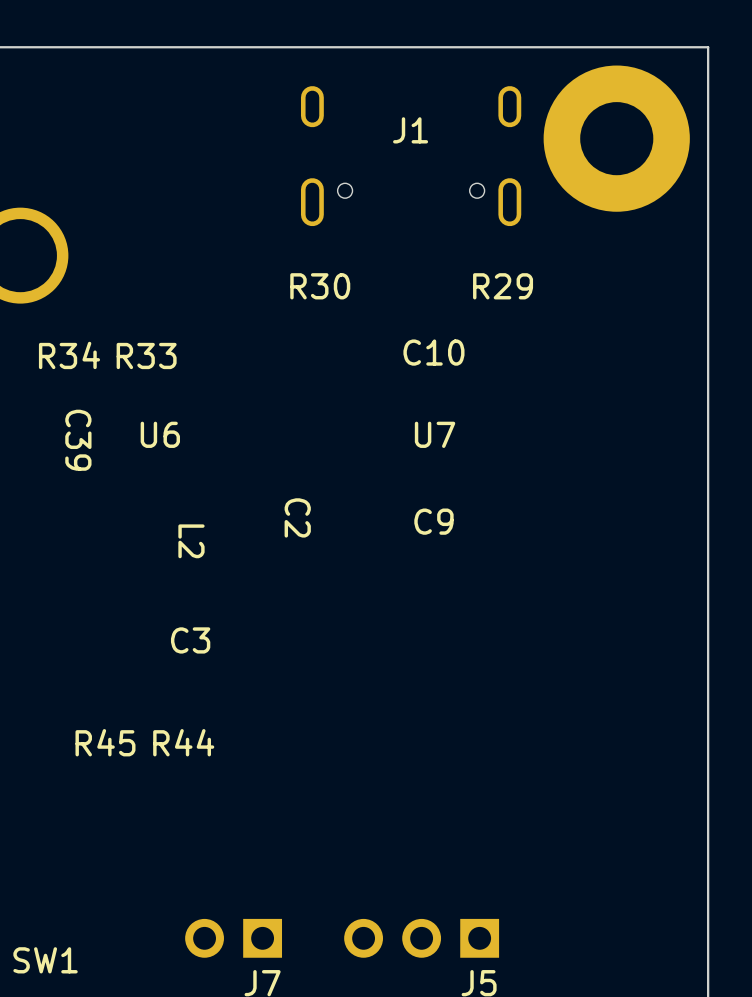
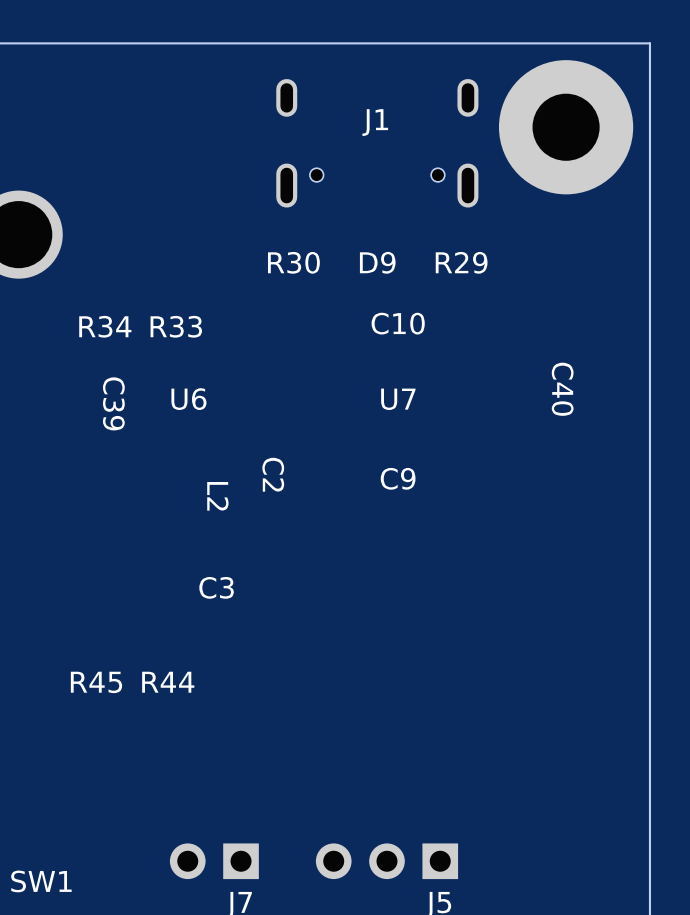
D9: none -> (377, 262)
R34 position: (69, 355) -> (105, 326)
R33 position: (146, 355) -> (176, 326)
C40: none -> (562, 389)
U6 position: (160, 434) -> (188, 399)
C39 position: (78, 440) -> (113, 403)
L2 position: (191, 541) -> (217, 496)
C3 position: (190, 640) -> (216, 587)

